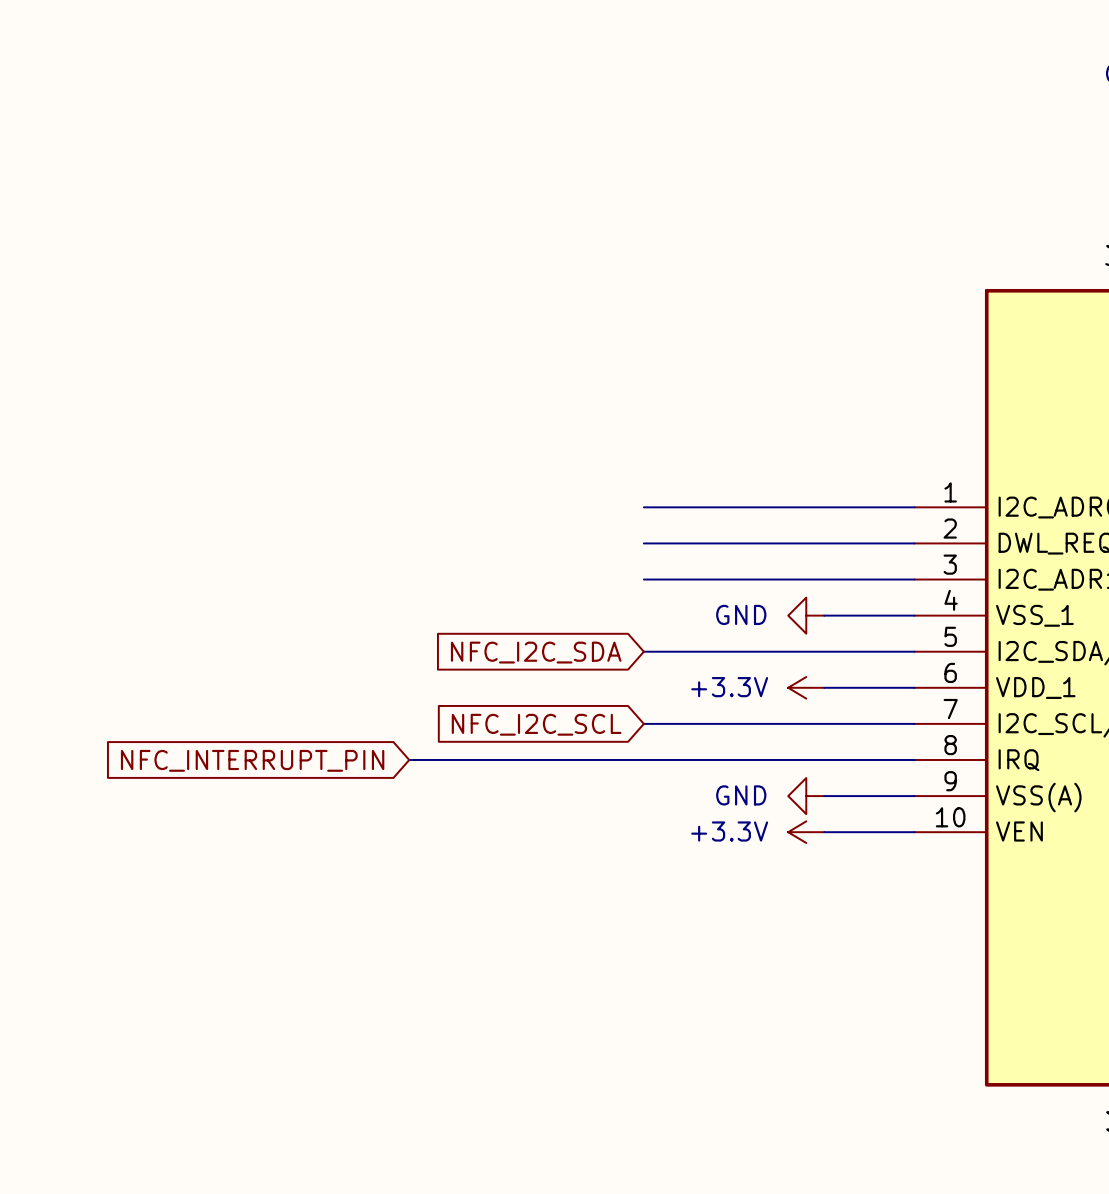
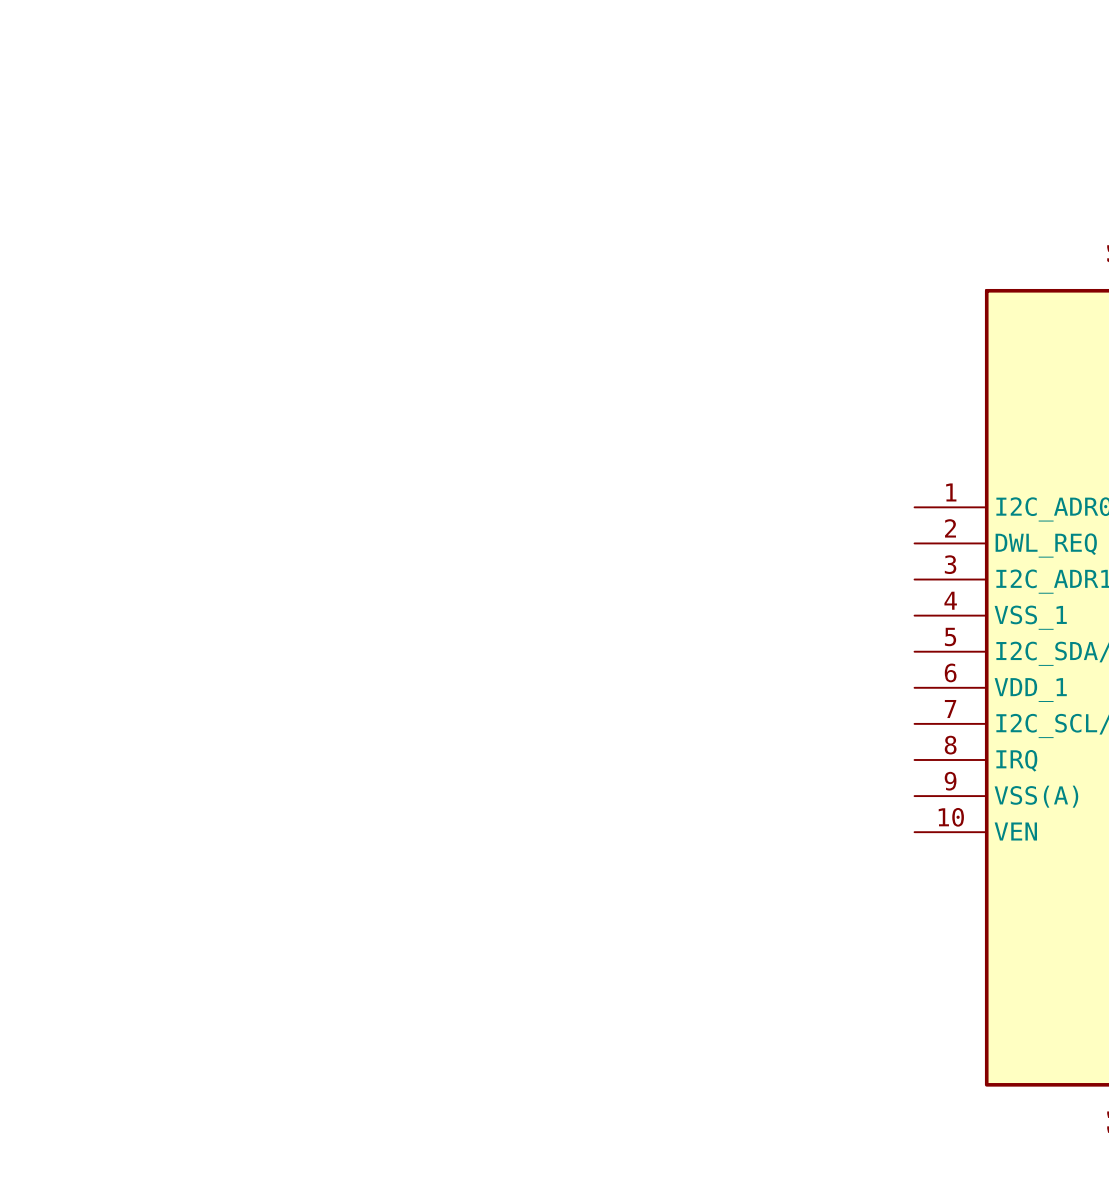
wire: (643, 507) (914, 507) -> none
wire: (643, 543) (914, 543) -> none
wire: (643, 579) (914, 579) -> none
power symbol: GND (806, 615) -> none
wire: (824, 615) (914, 615) -> none
wire: (643, 651) (914, 651) -> none
global label: NFC_I2C_SDA (536, 652) -> none
power symbol: +3.3V (806, 687) -> none
wire: (824, 687) (914, 687) -> none
wire: (643, 723) (914, 723) -> none
global label: NFC_I2C_SCL (536, 724) -> none
wire: (409, 759) (914, 759) -> none
global label: NFC_INTERRUPT_PIN (252, 760) -> none
power symbol: GND (806, 796) -> none
wire: (824, 796) (914, 796) -> none
power symbol: +3.3V (806, 832) -> none
wire: (824, 832) (914, 832) -> none

